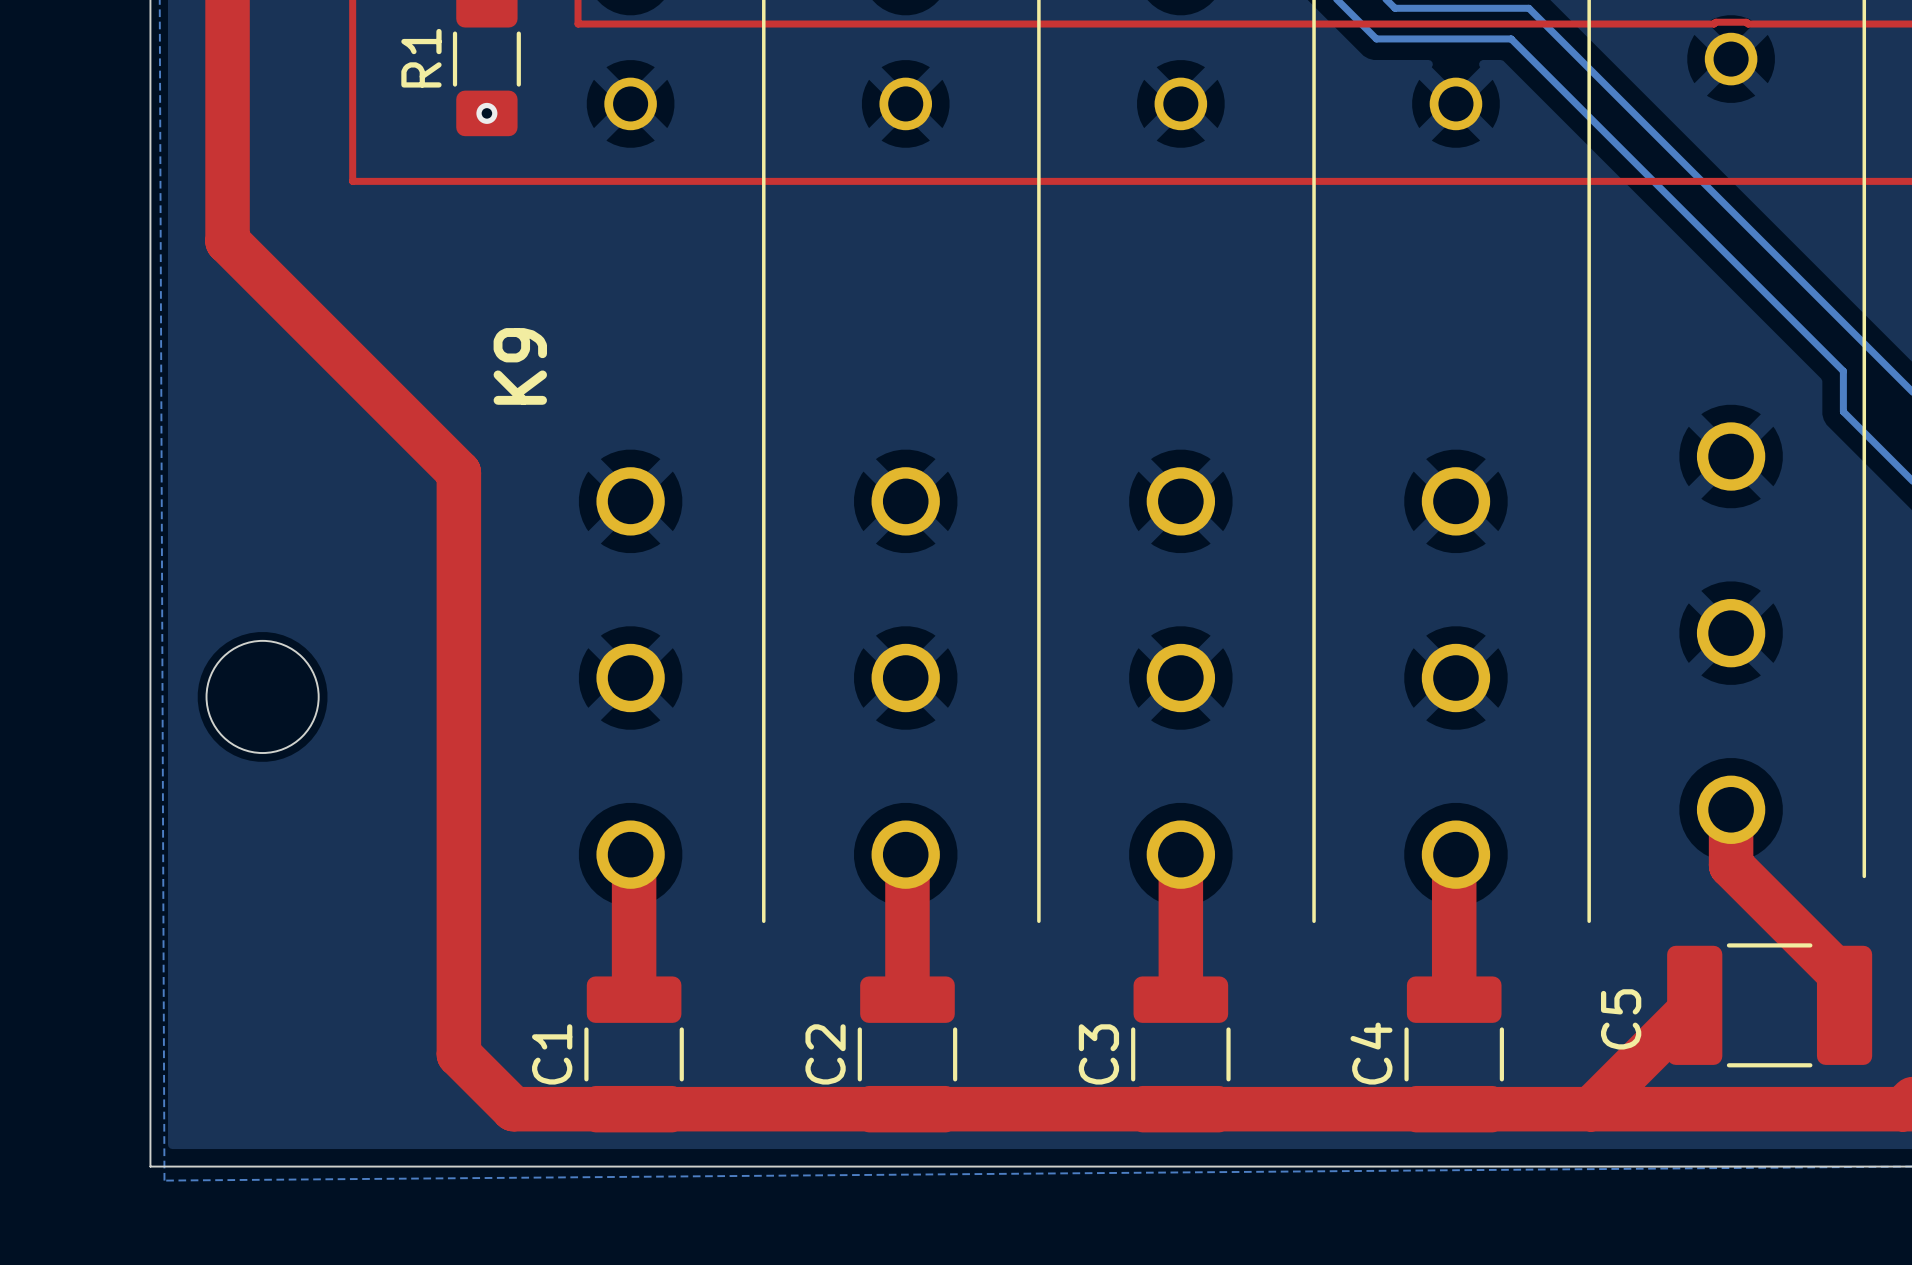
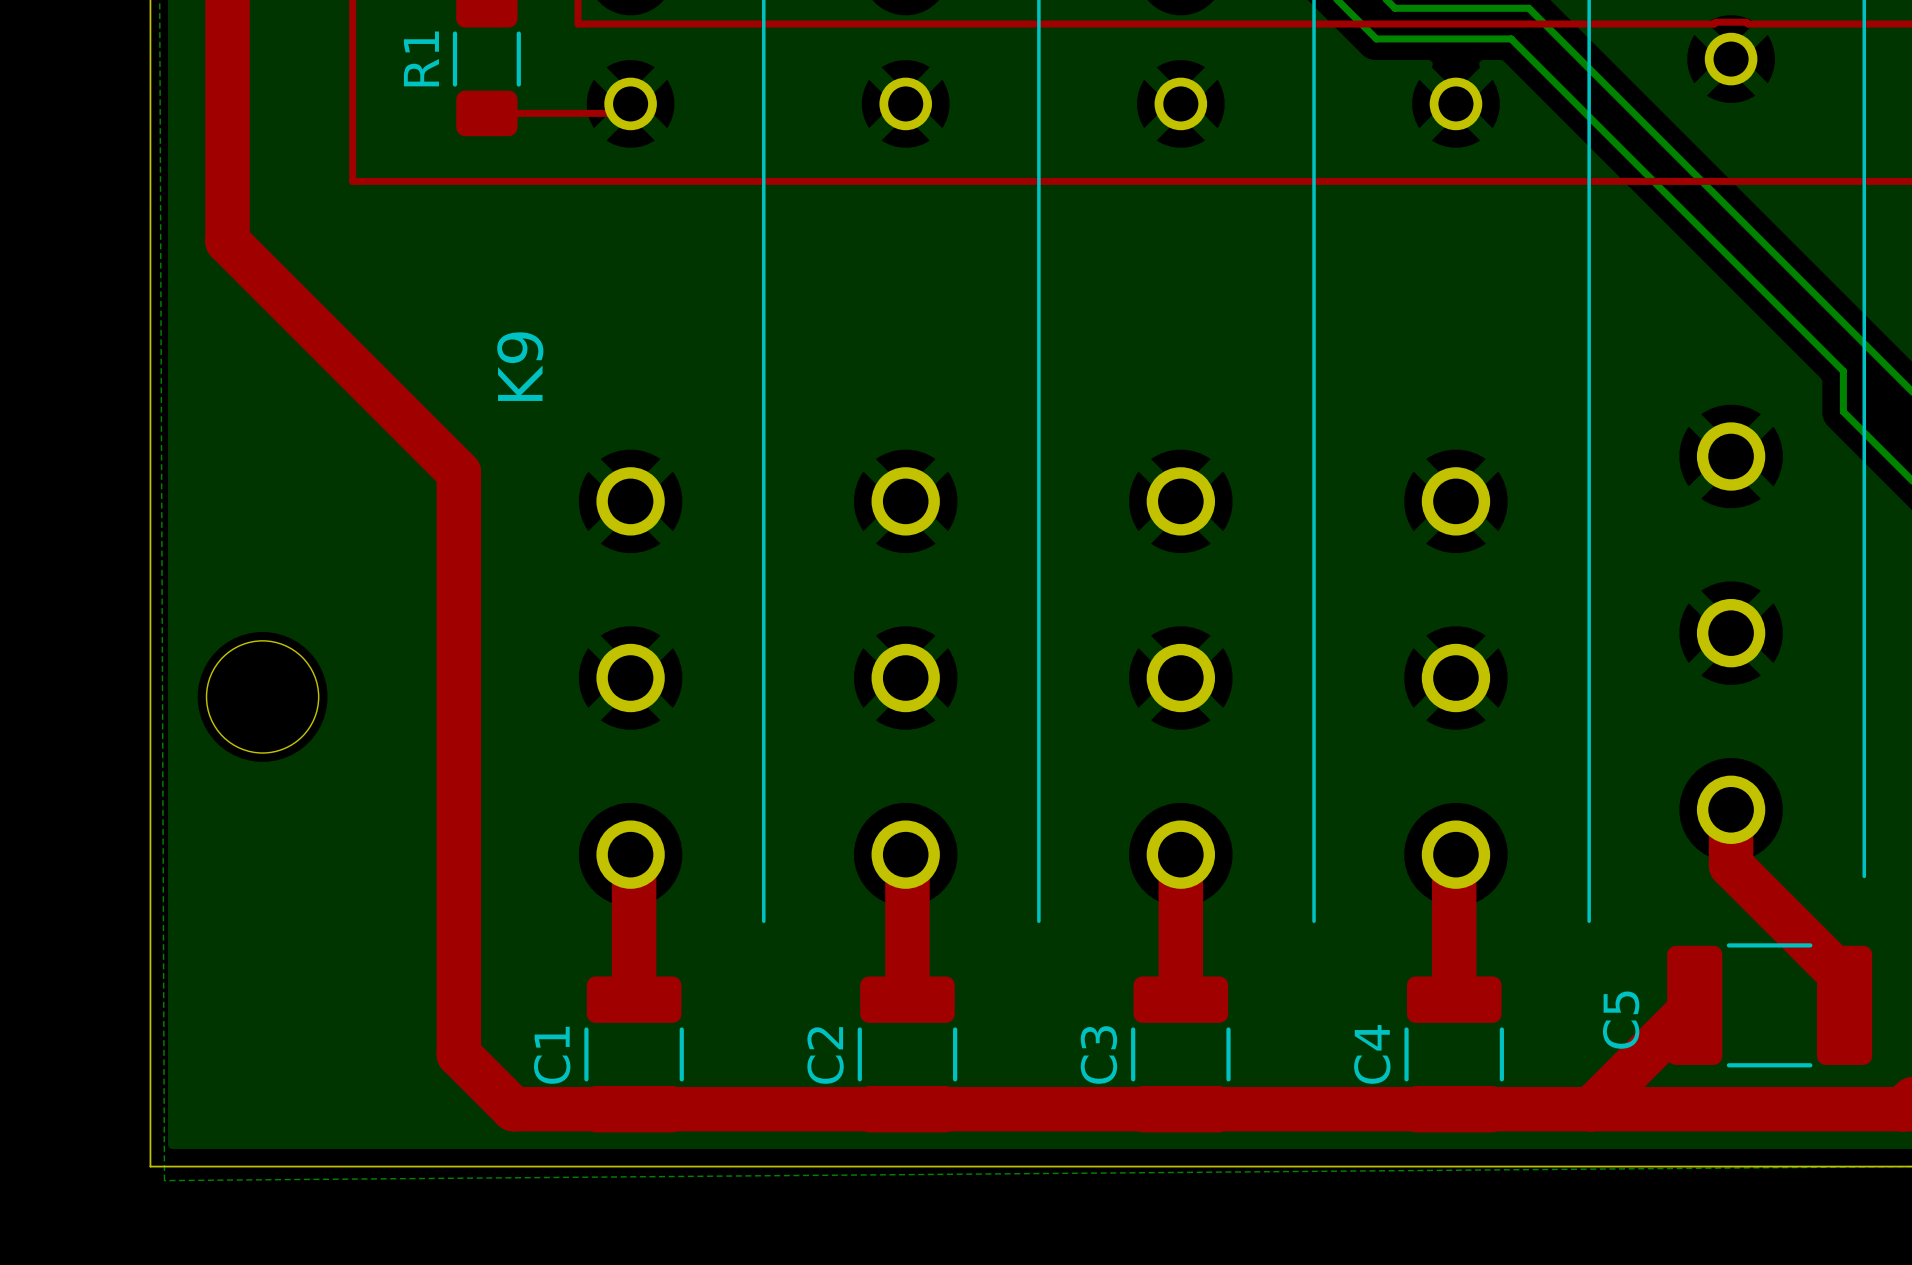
top track: none -> (486, 113) (621, 113)
via: (486, 113) -> none

